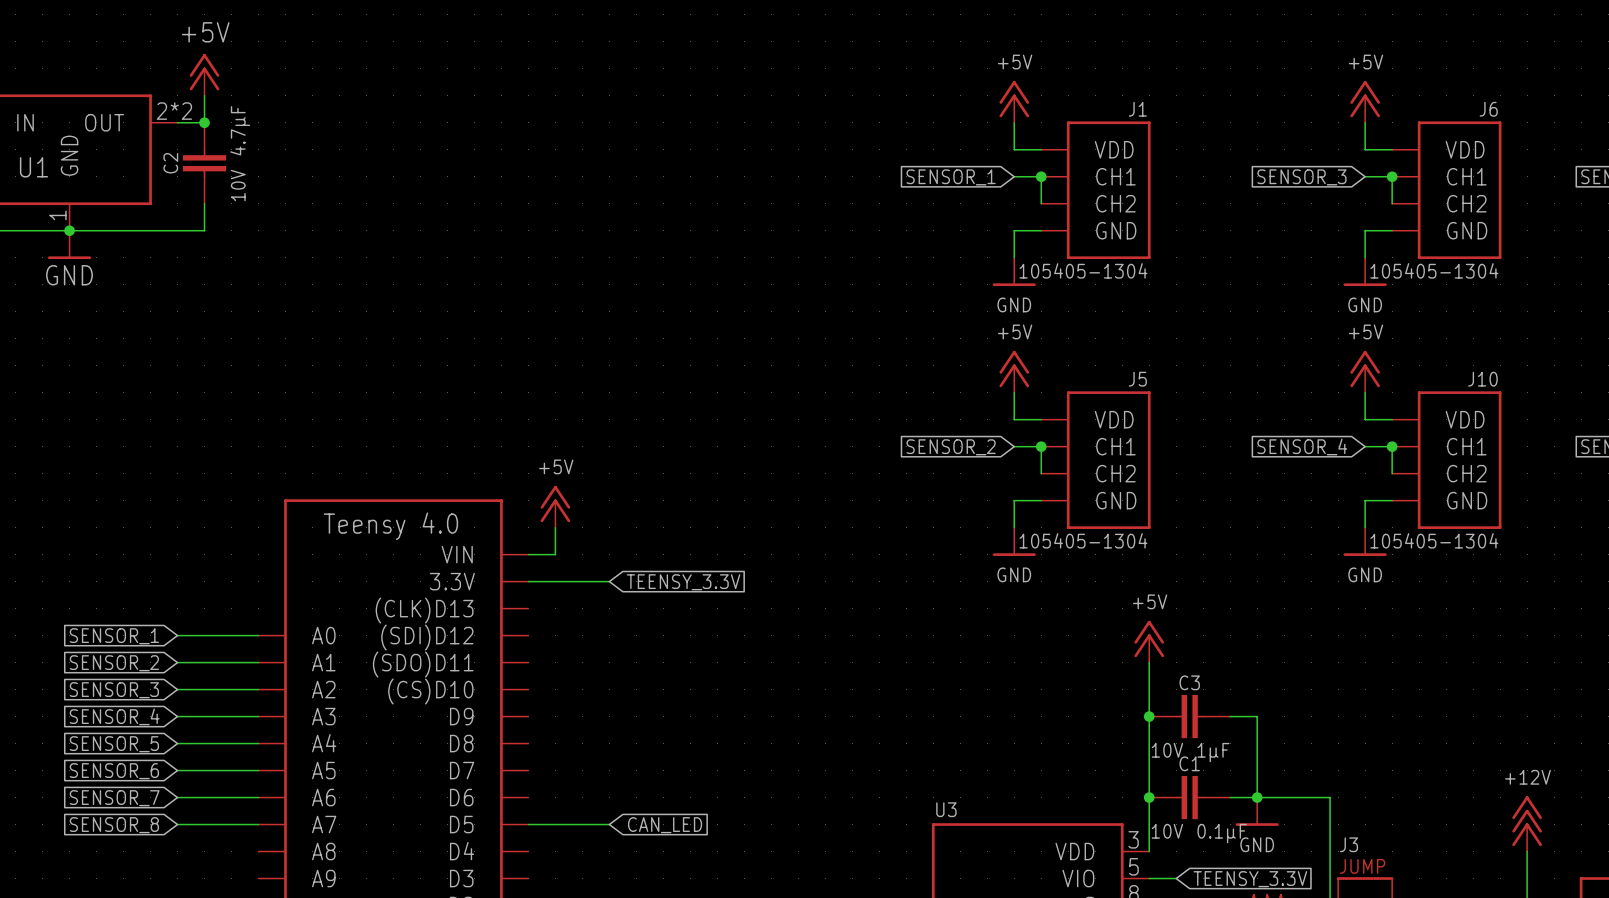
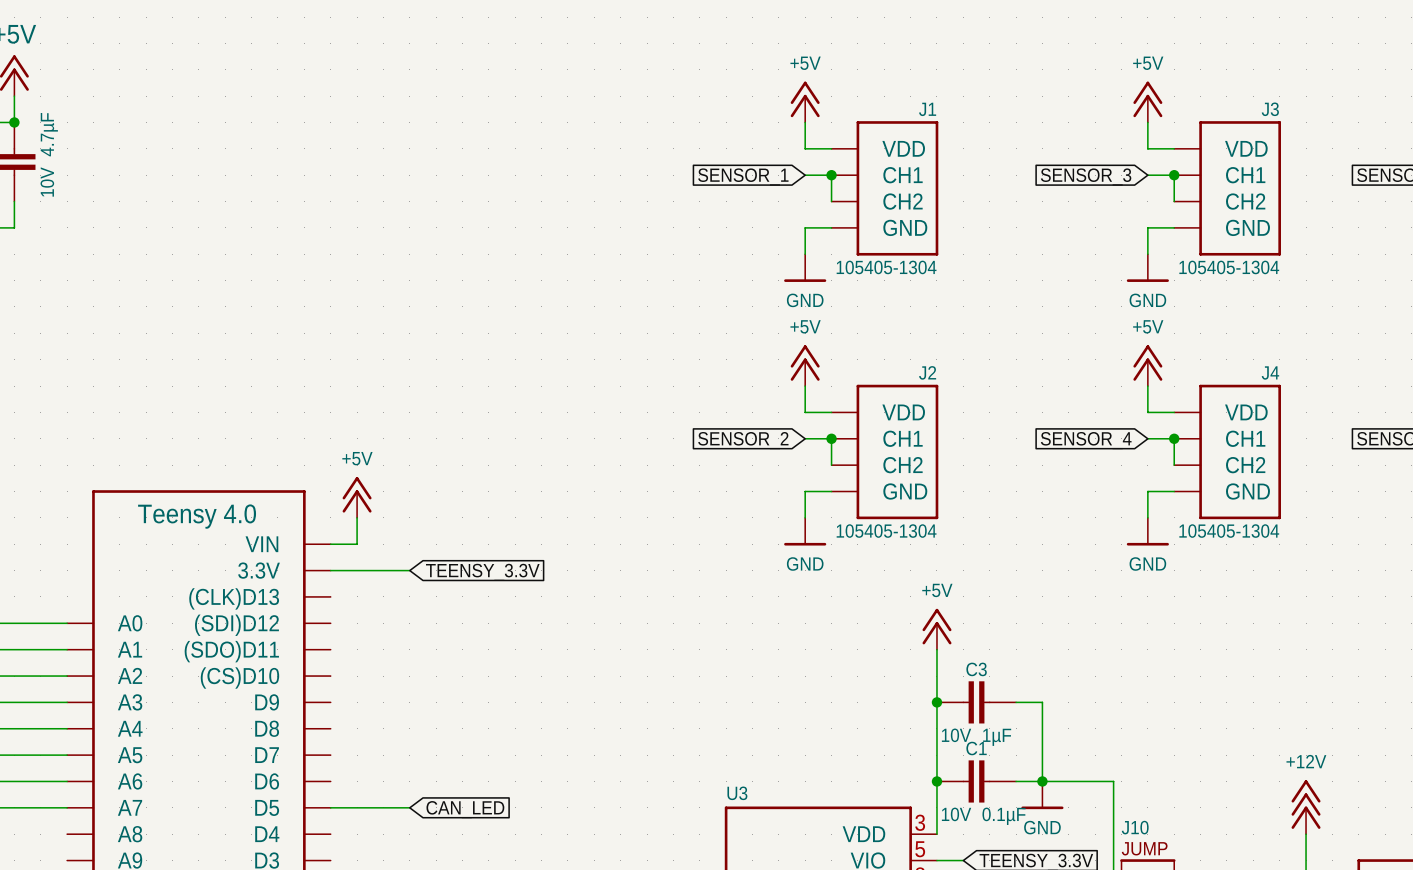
J6 name: J6 (1488, 109) -> J3 (1270, 109)
J5 name: J5 (1137, 379) -> J2 (927, 372)
J10 name: J10 (1482, 379) -> J4 (1270, 372)
J3 name: J3 (1348, 844) -> J10 (1135, 827)

